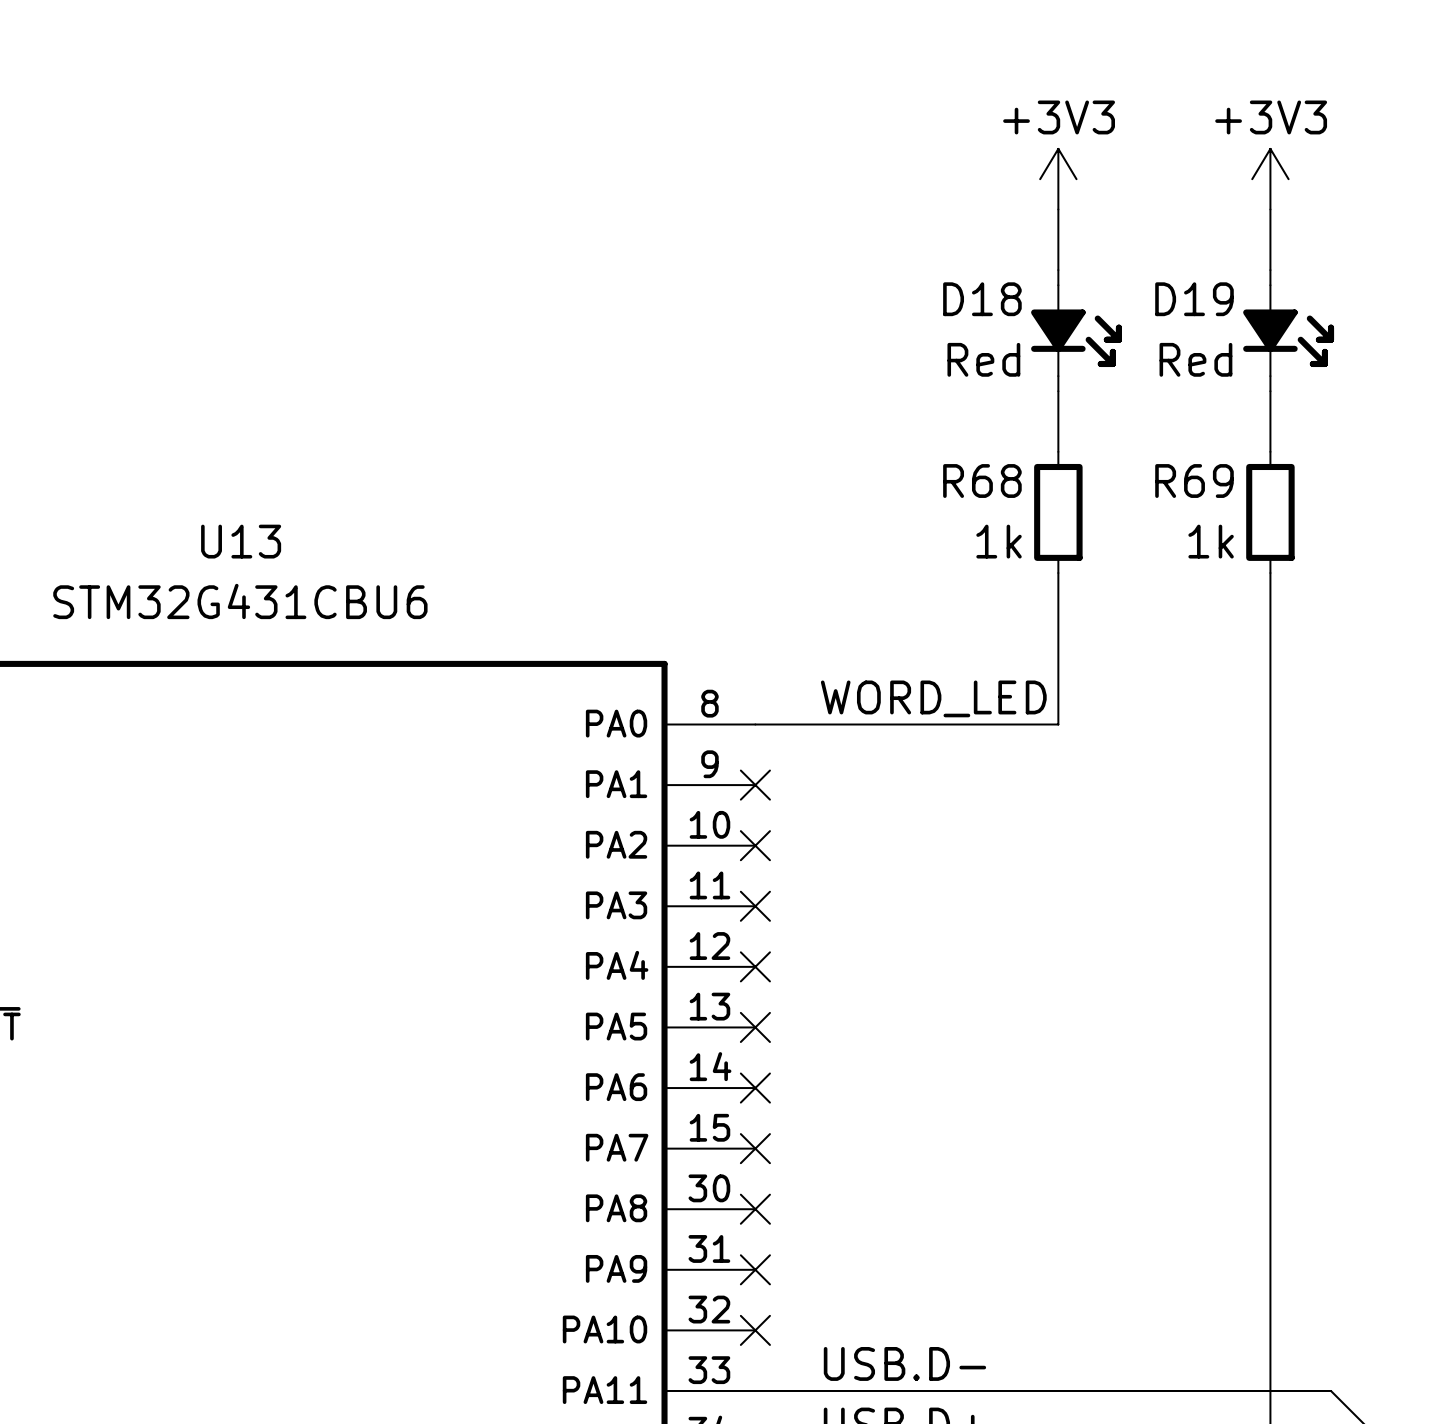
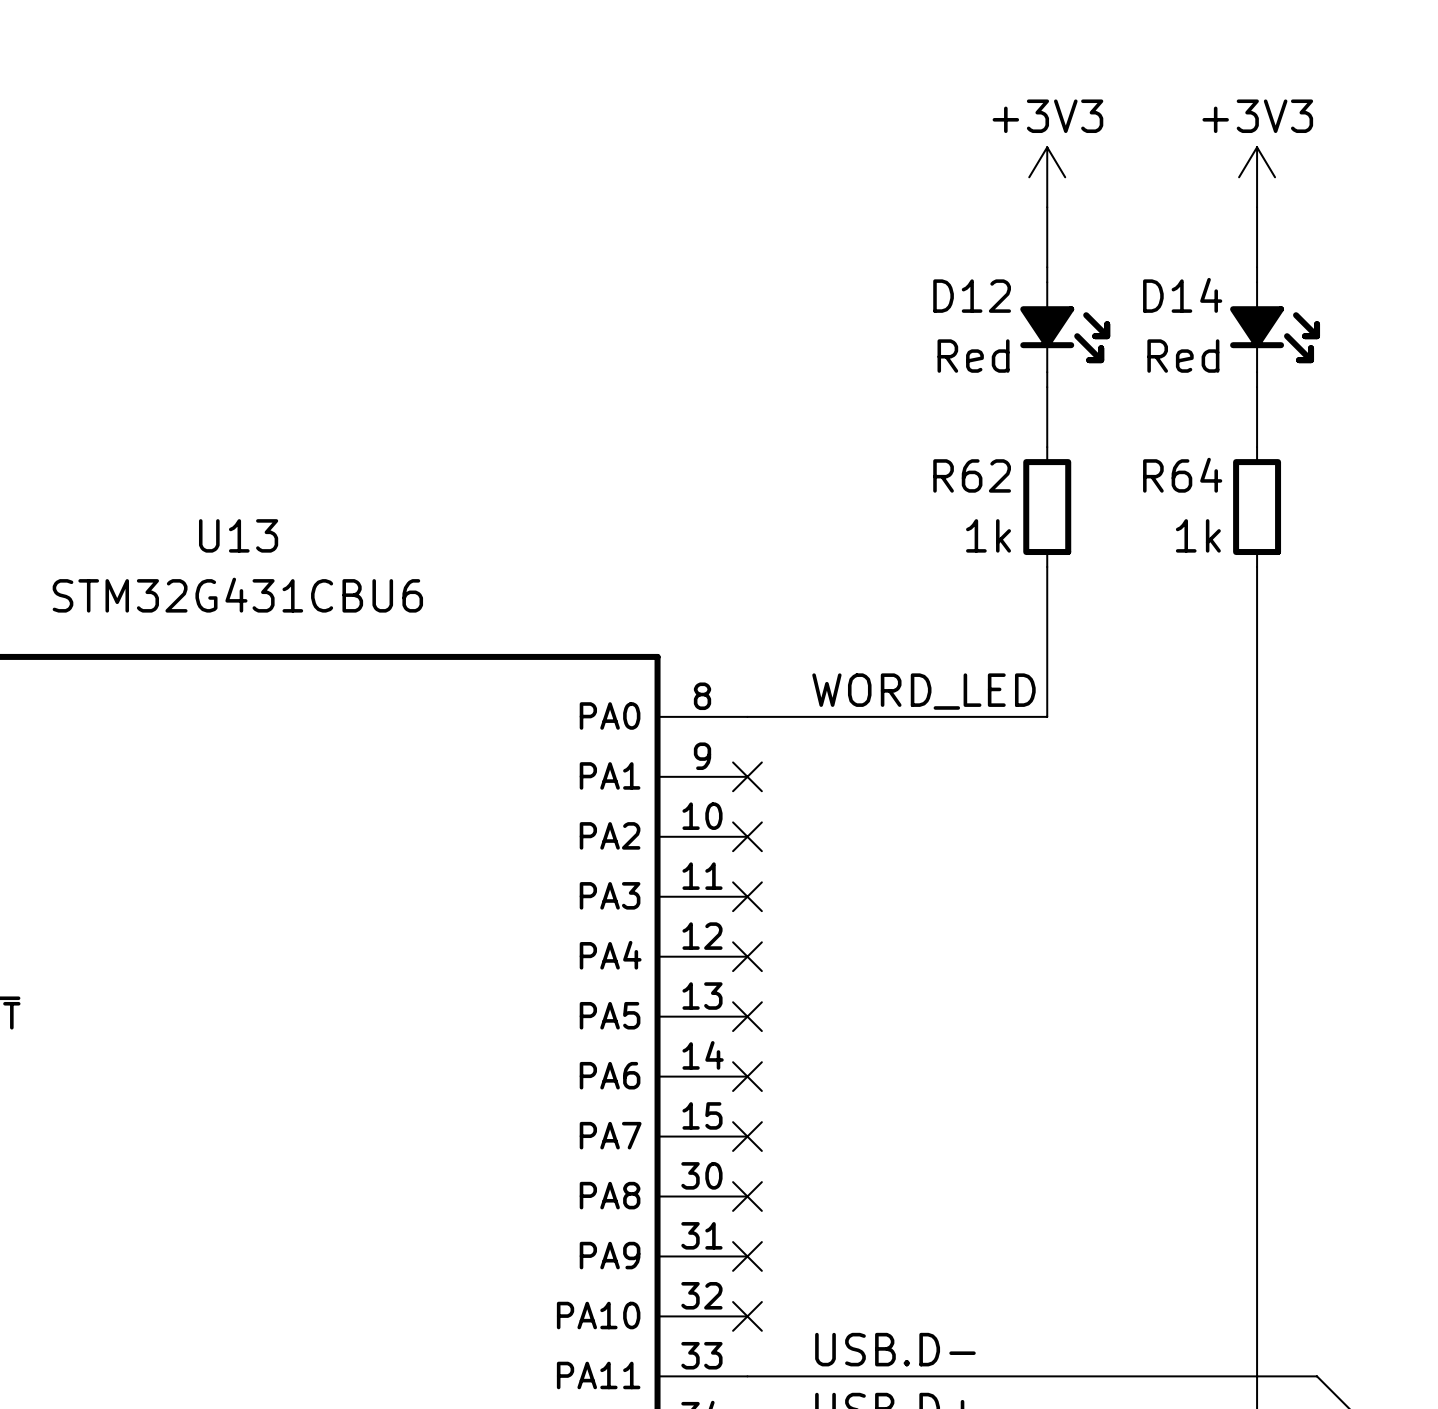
D18 name: D18 (982, 299) -> D12 (972, 296)
D19 name: D19 (1194, 299) -> D14 (1182, 295)
R68 name: R68 (982, 481) -> R62 (972, 475)
R69 name: R69 (1194, 481) -> R64 (1182, 475)

